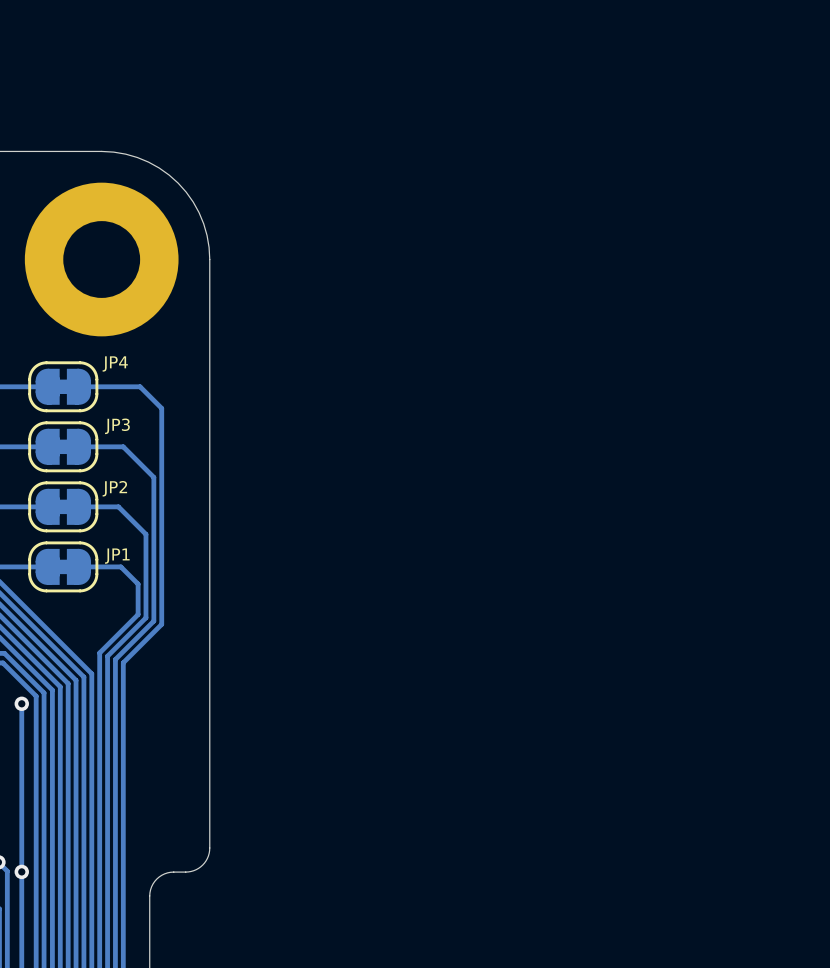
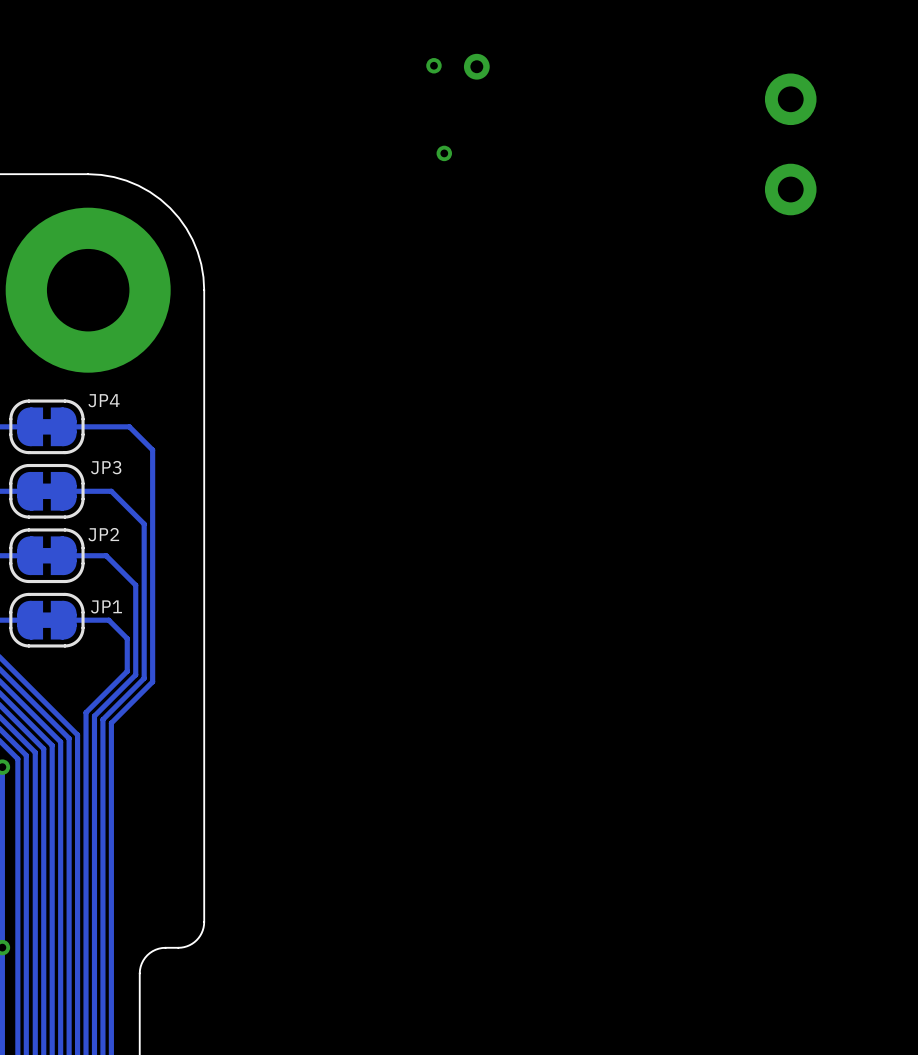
via: none -> (433, 65)
via: none -> (476, 66)
part: none -> (790, 99)
via: none -> (444, 153)
part: none -> (790, 189)

